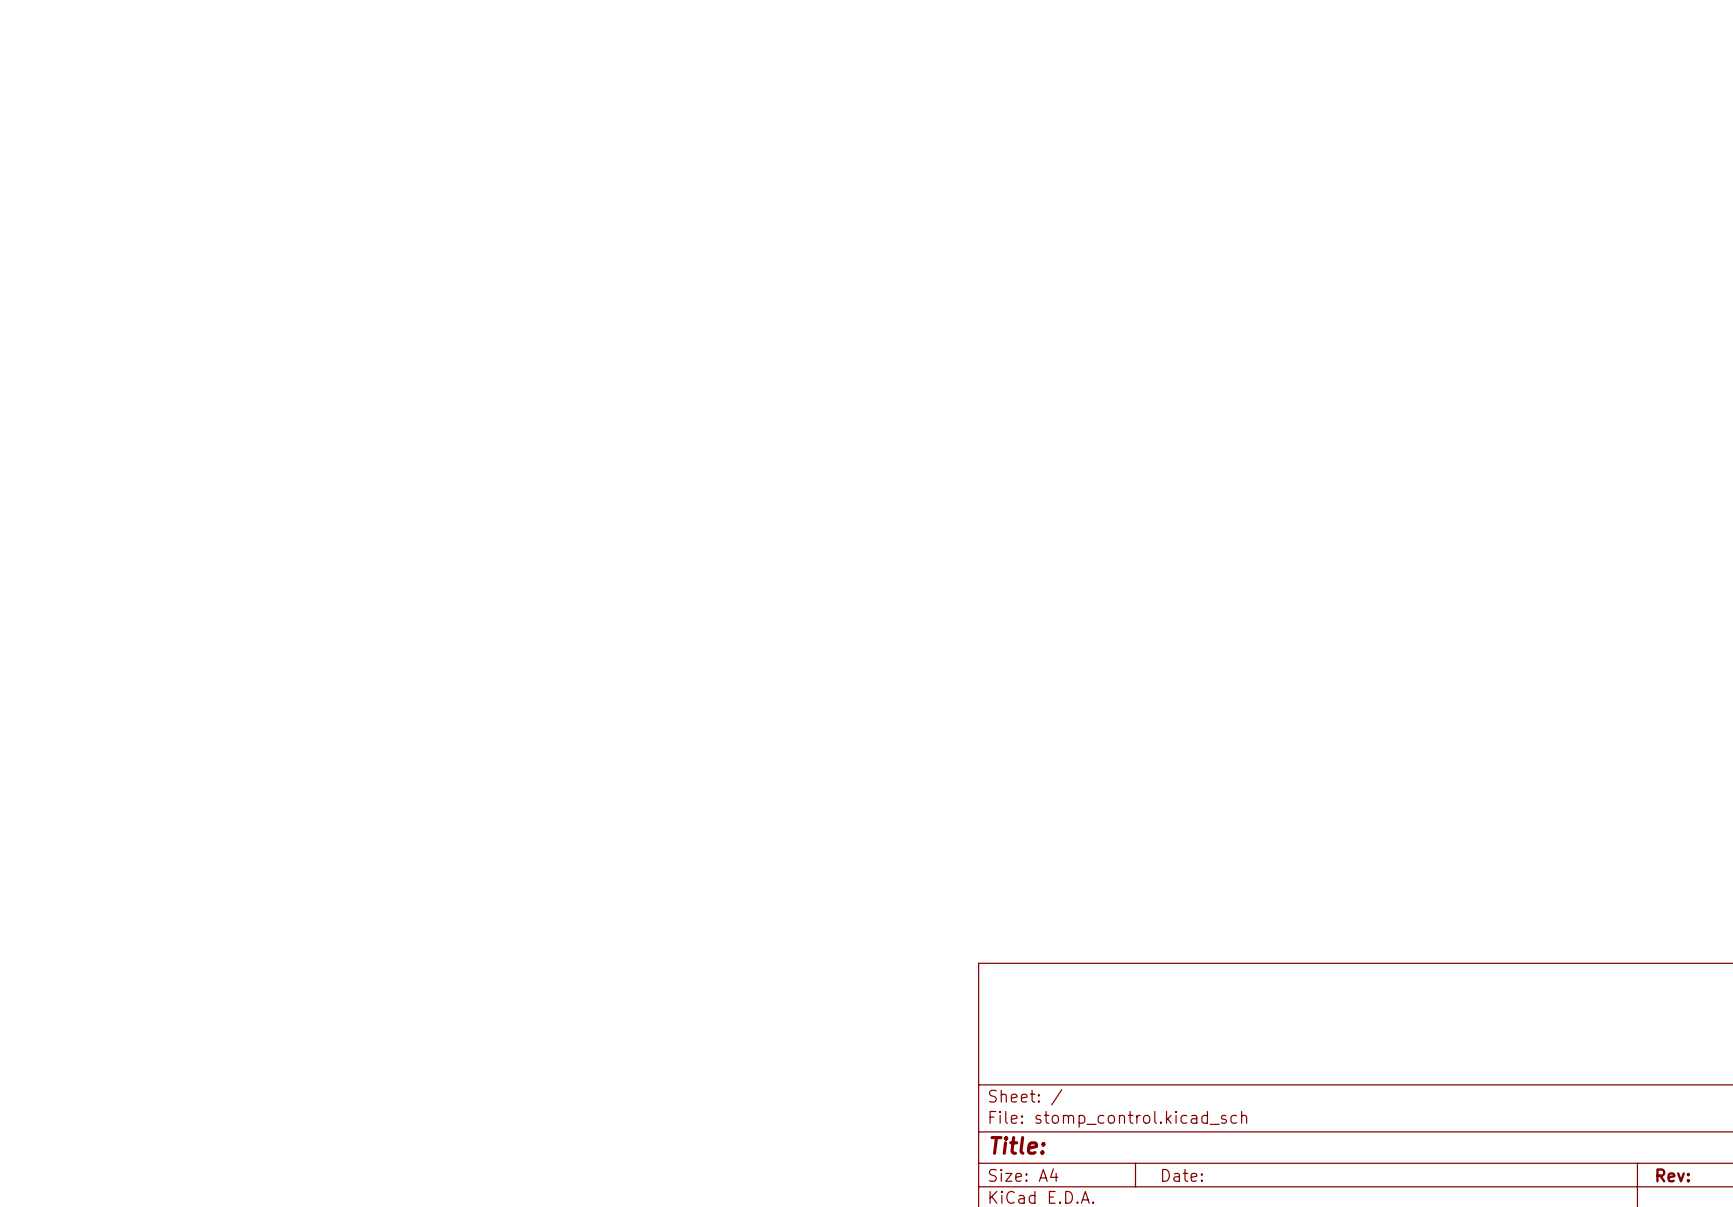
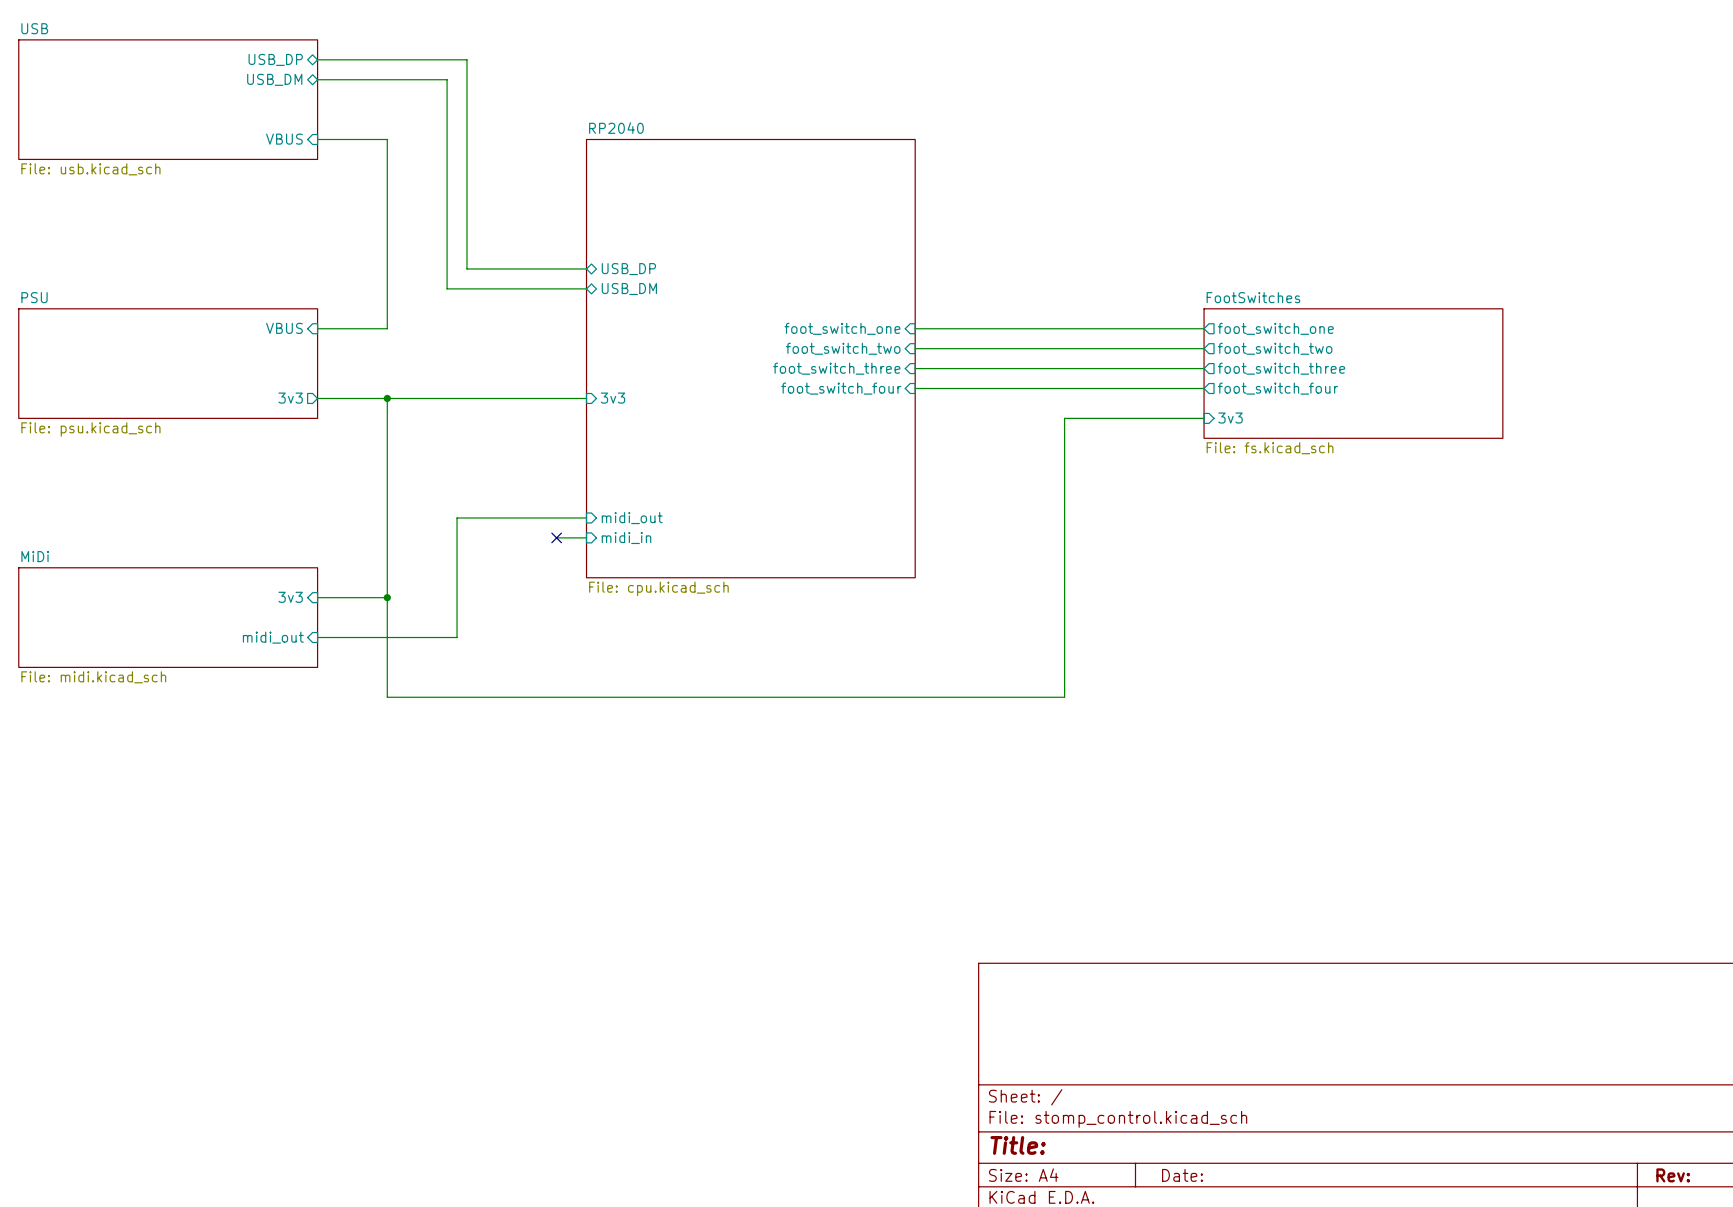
sheet pin: none -> USB_DP (275, 59)
wire: none -> (317, 59) (466, 59) (466, 268) (586, 268)
sheet pin: none -> USB_DM (274, 79)
wire: none -> (317, 79) (447, 79) (447, 288) (586, 288)
sheet USB: none -> File: usb.kicad_sch (168, 99)
sheet pin: none -> VBUS (284, 139)
wire: none -> (317, 139) (387, 139) (387, 328) (317, 328)
sheet pin: none -> USB_DP (628, 269)
sheet pin: none -> USB_DM (629, 289)
sheet pin: none -> VBUS (284, 328)
sheet pin: none -> foot_switch_one (842, 328)
wire: none -> (915, 328) (1204, 328)
sheet pin: none -> foot_switch_one (1275, 328)
sheet pin: none -> foot_switch_two (843, 348)
wire: none -> (915, 348) (1204, 348)
sheet pin: none -> foot_switch_two (1275, 348)
sheet RP2040: none -> File: cpu.kicad_sch (750, 358)
sheet PSU: none -> File: psu.kicad_sch (168, 363)
sheet pin: none -> foot_switch_three (836, 368)
wire: none -> (915, 368) (1204, 368)
sheet pin: none -> foot_switch_three (1281, 368)
sheet FootSwitches: none -> File: fs.kicad_sch (1353, 373)
sheet pin: none -> foot_switch_four (841, 388)
wire: none -> (915, 388) (1204, 388)
sheet pin: none -> foot_switch_four (1277, 388)
sheet pin: none -> 3v3 (290, 398)
wire: none -> (317, 398) (586, 398)
wire: none -> (387, 398) (387, 697) (1064, 697) (1064, 418) (1204, 418)
junction: none -> (387, 398)
sheet pin: none -> 3v3 (612, 398)
sheet pin: none -> 3v3 (1230, 418)
wire: none -> (586, 517) (457, 517) (457, 637) (317, 637)
sheet pin: none -> midi_out (632, 518)
wire: none -> (556, 537) (586, 537)
no-connect mark: none -> (556, 537)
sheet pin: none -> midi_in (626, 538)
sheet pin: none -> 3v3 (290, 597)
wire: none -> (317, 597) (387, 597)
junction: none -> (387, 597)
sheet MiDi: none -> File: midi.kicad_sch (168, 617)
sheet pin: none -> midi_out (273, 637)

